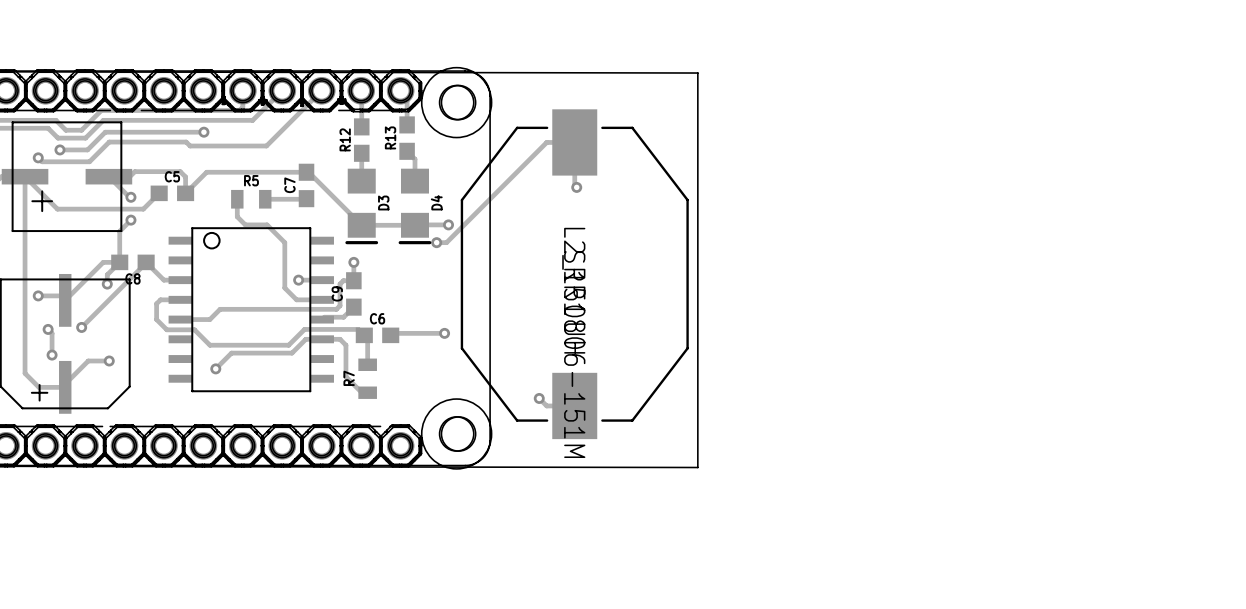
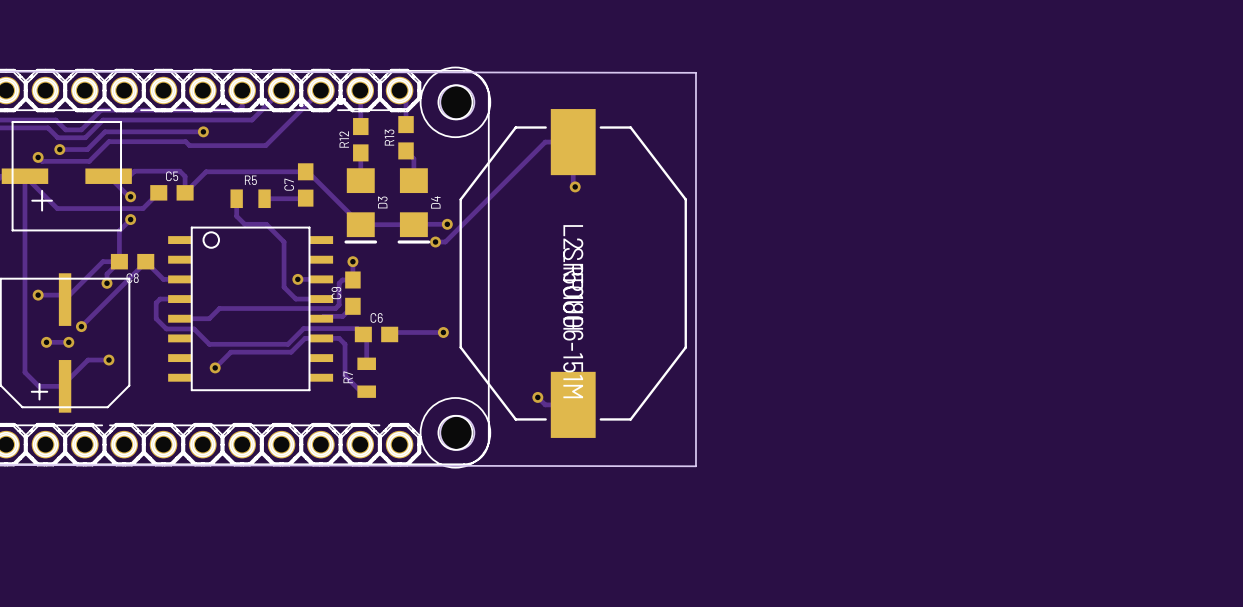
track: (48, 329) (52, 333) (52, 355) -> none
via: (48, 329) -> none
track: none -> (46, 342) (68, 342)
via: none -> (46, 342)
via: none -> (68, 342)
via: (52, 355) -> none

